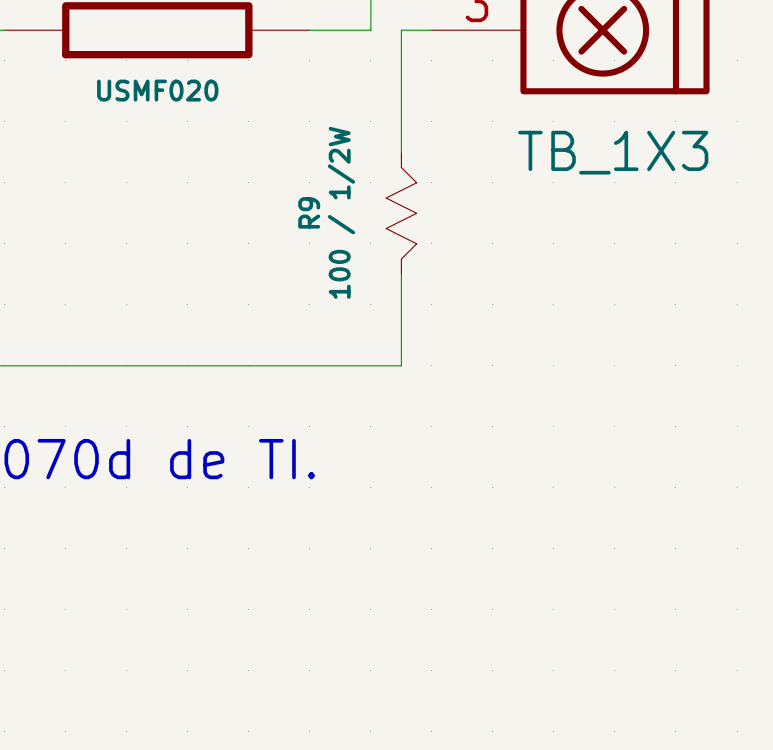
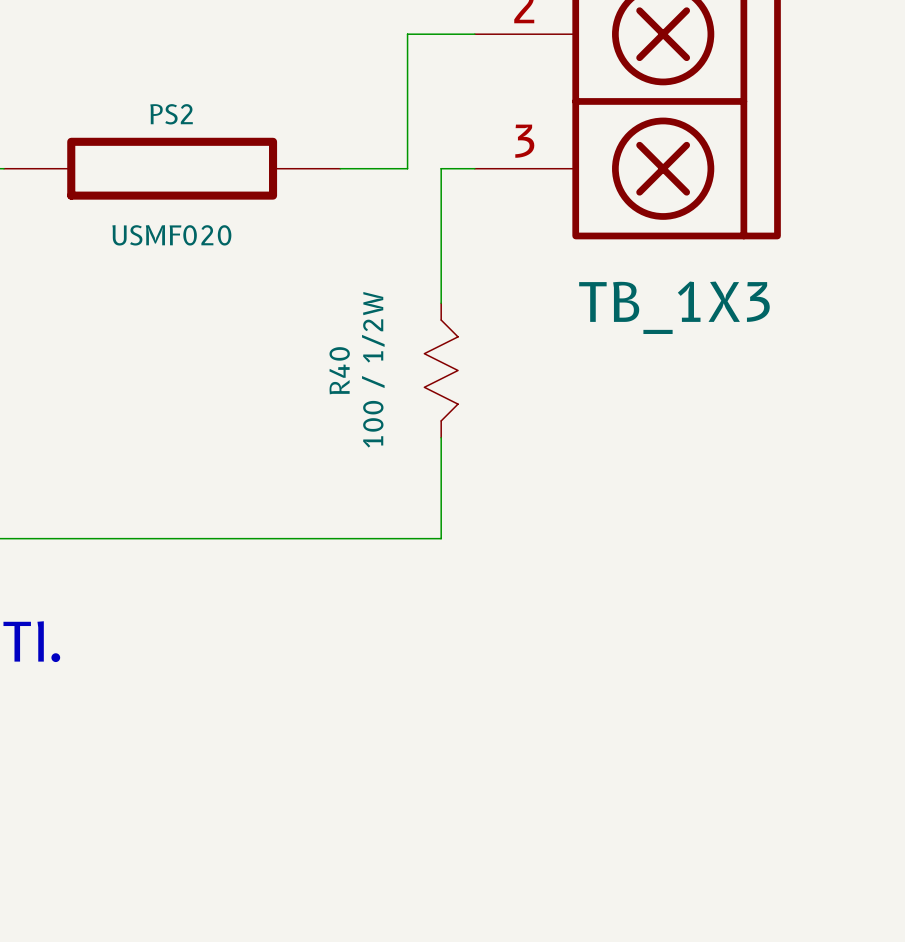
R9 name: R9 (309, 212) -> R40 (339, 370)

